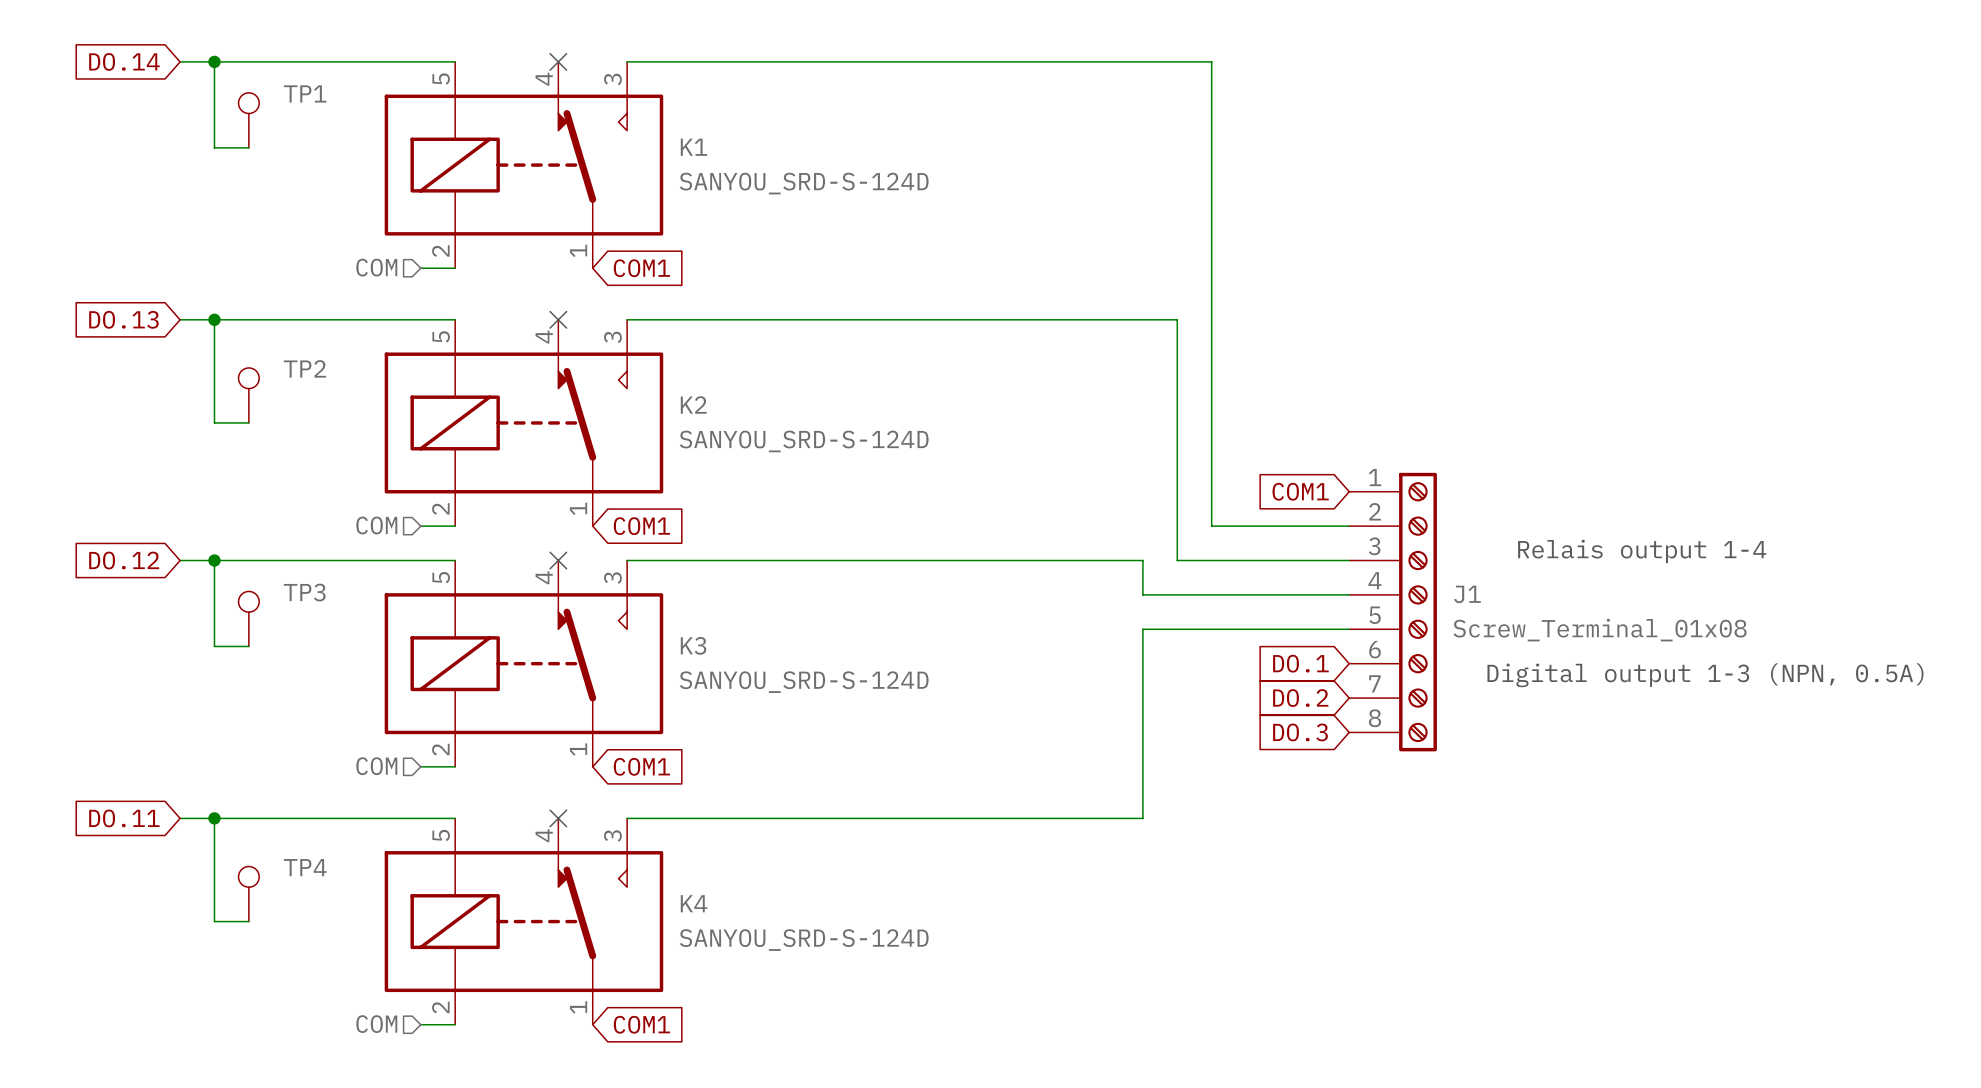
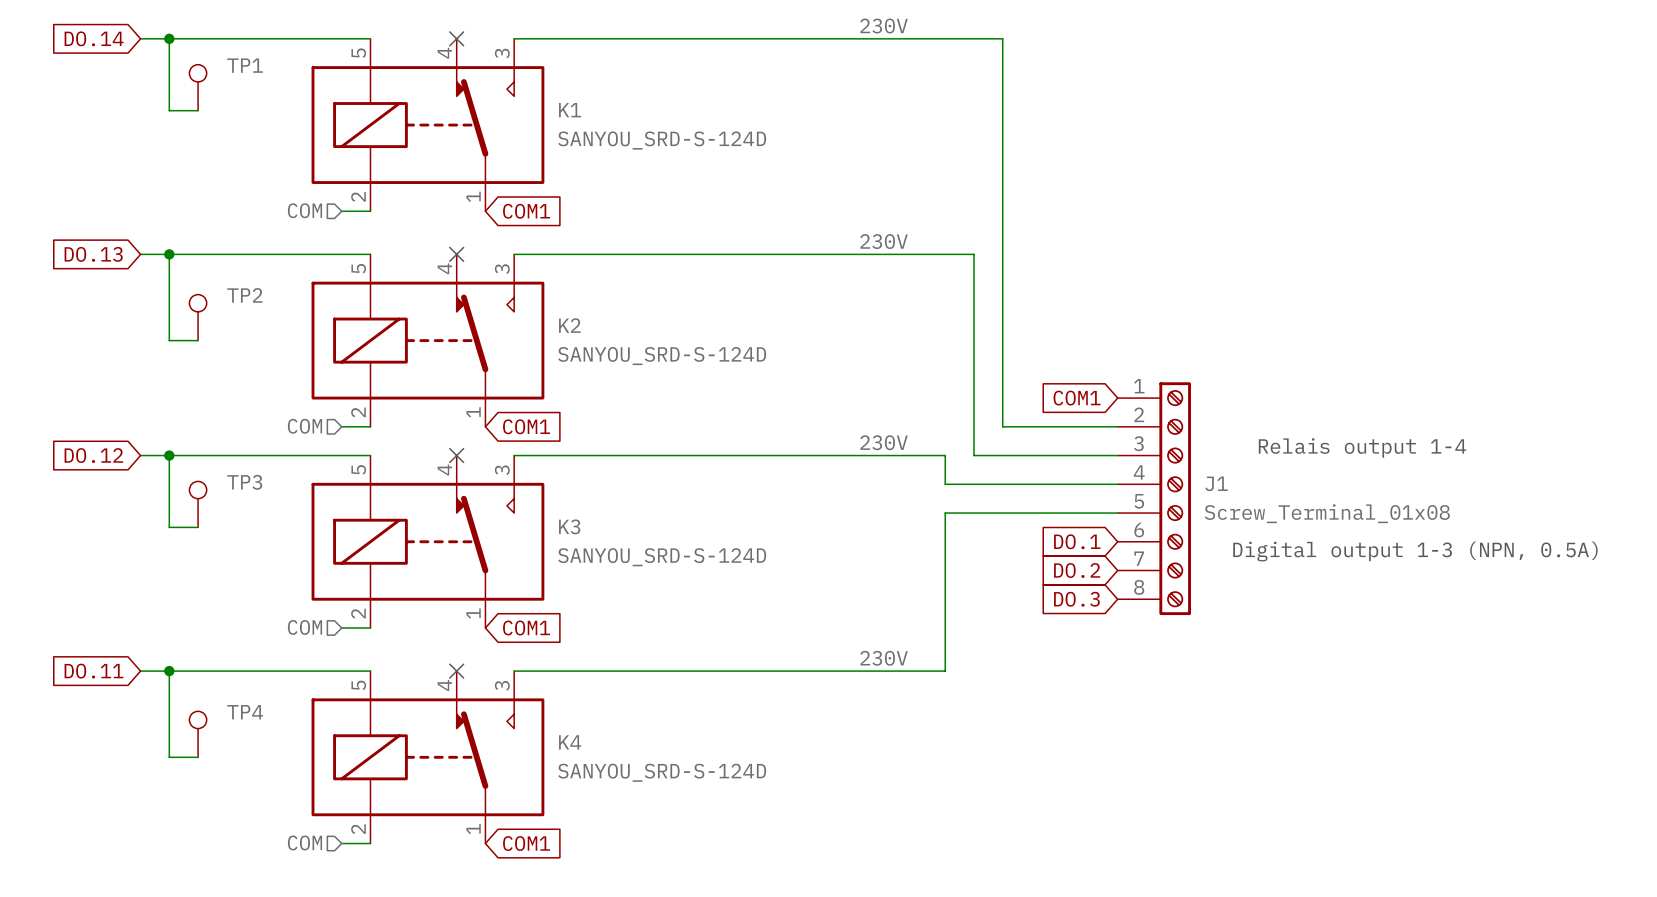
label: none -> 230V (884, 26)
label: none -> 230V (884, 241)
label: none -> 230V (884, 442)
label: none -> 230V (884, 658)

